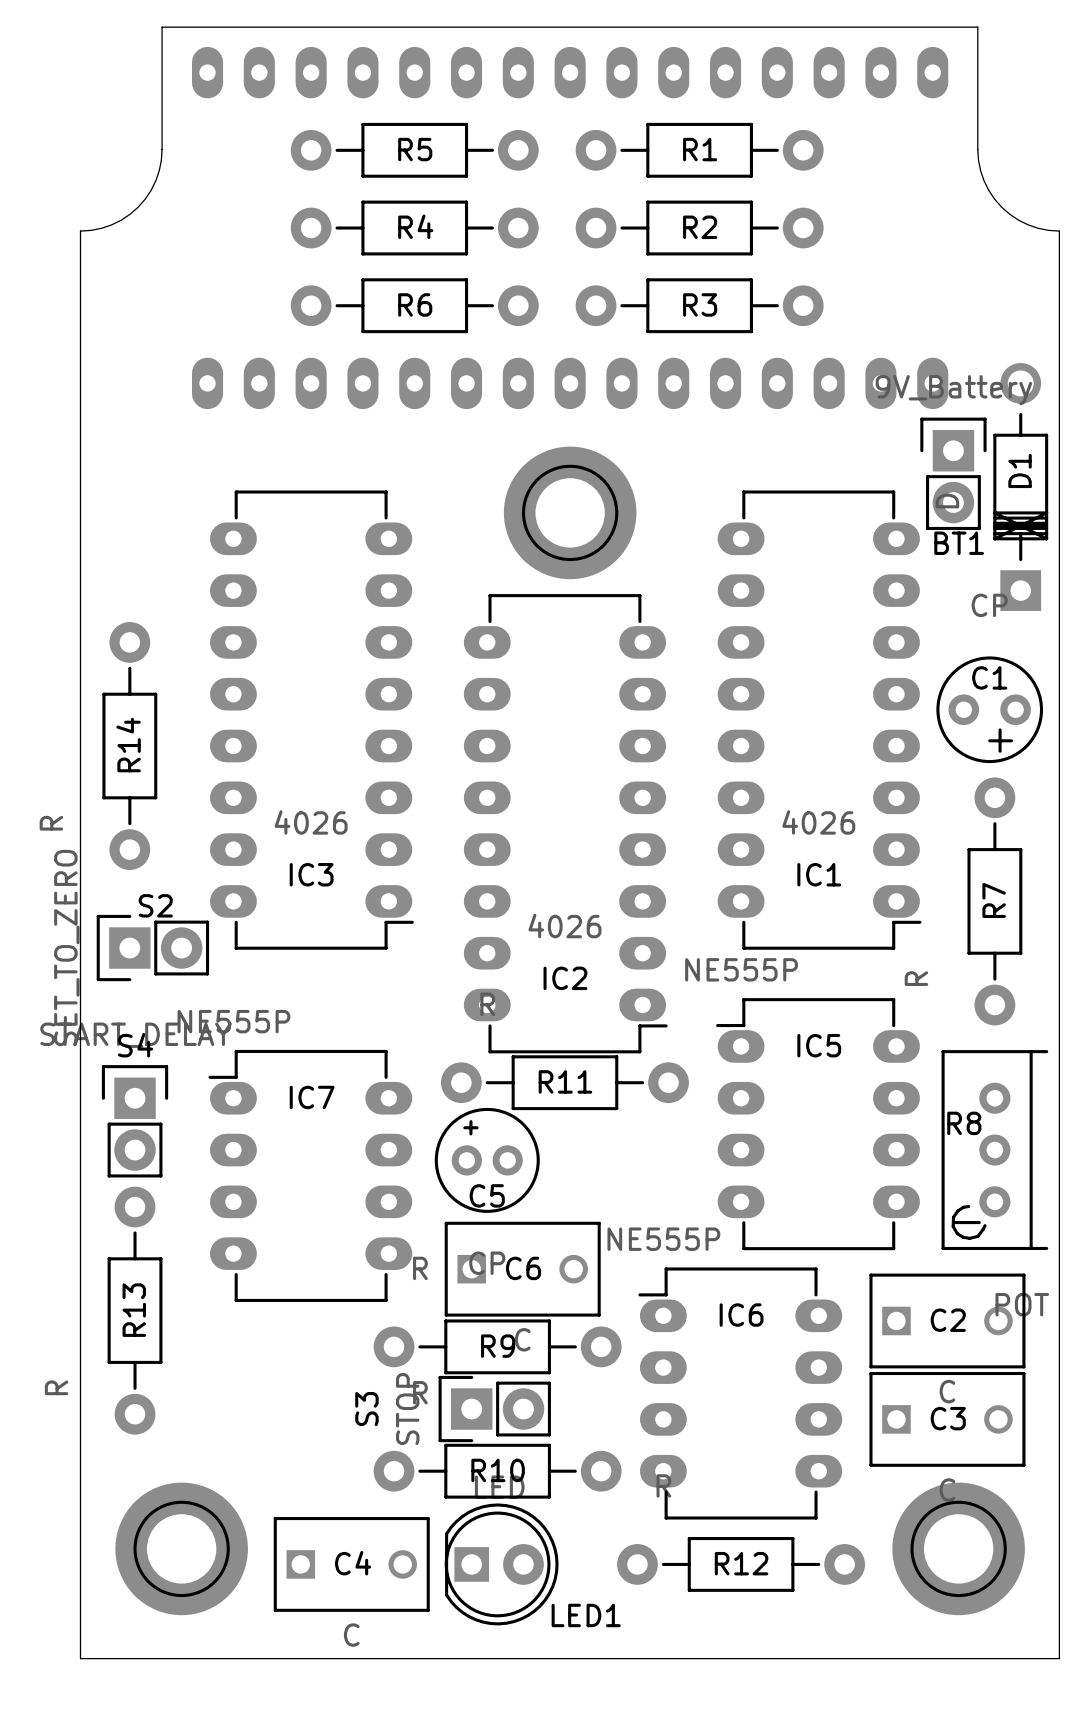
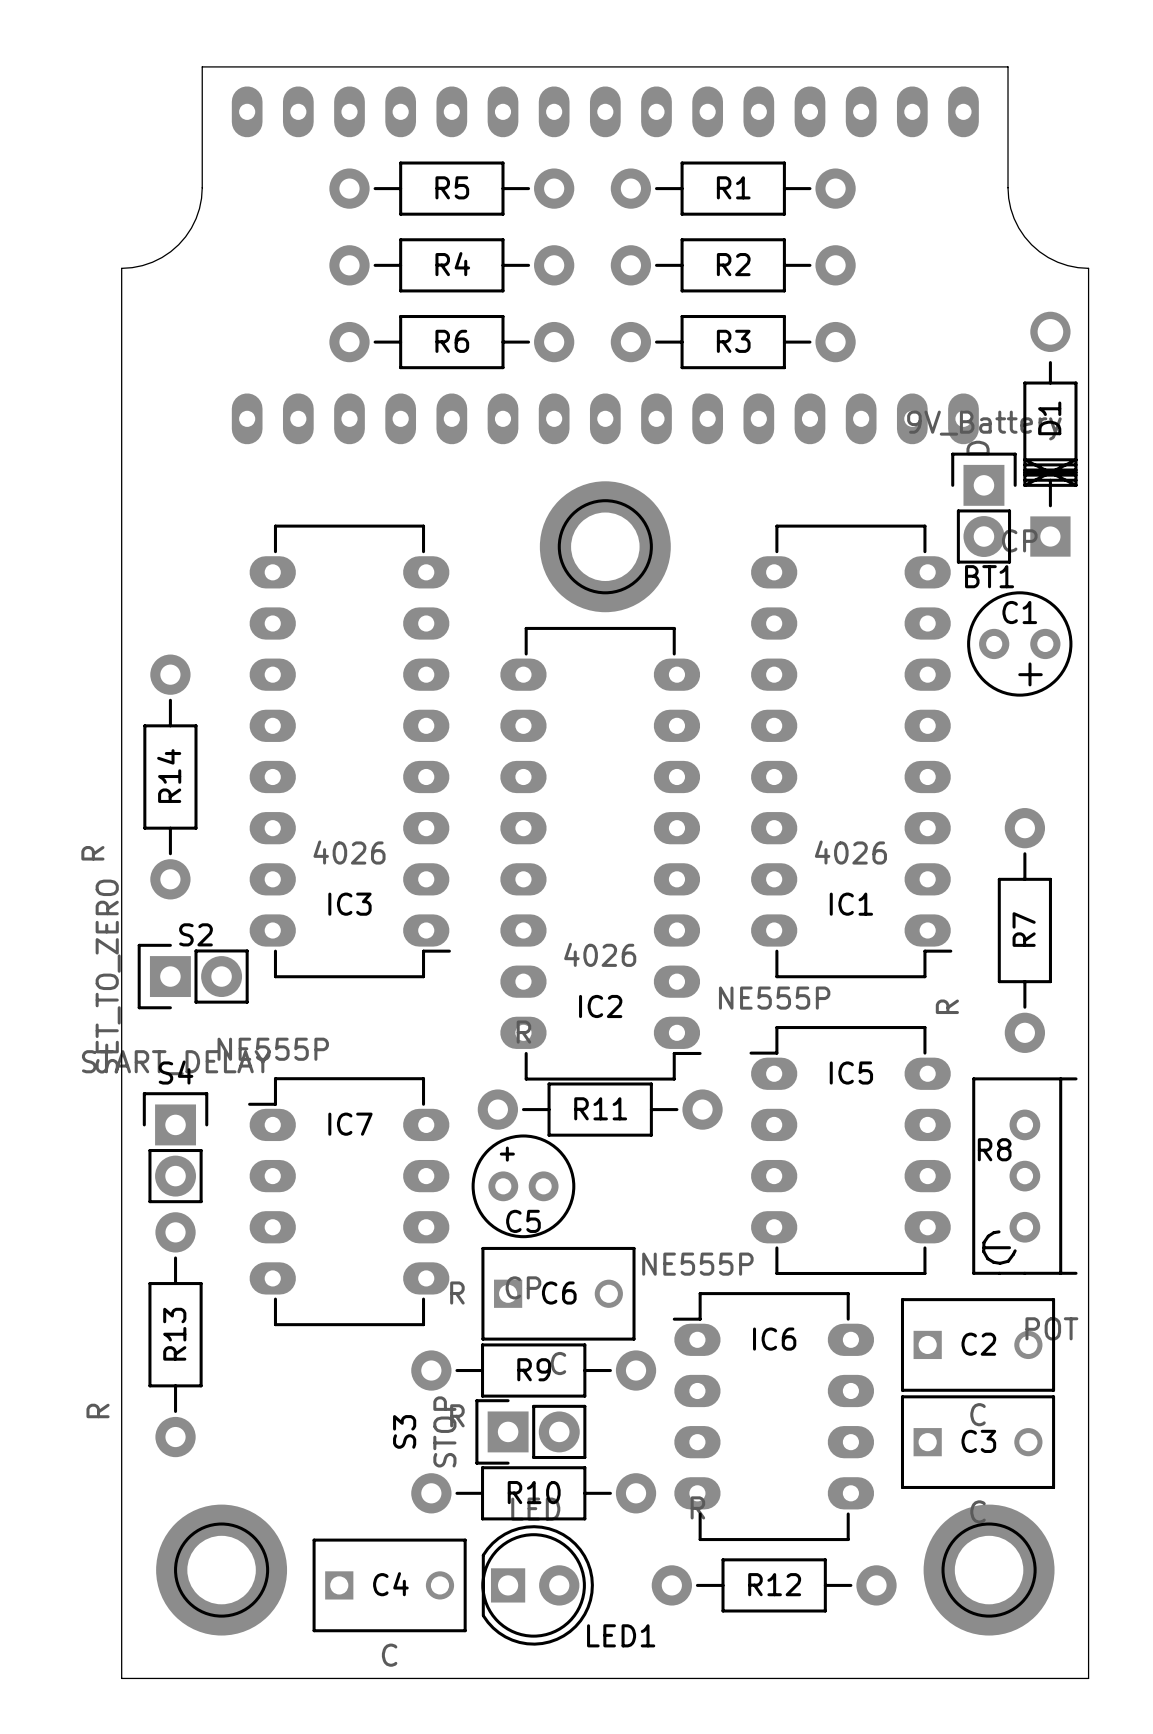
D1 position: (1020, 487) -> (1050, 434)
C1 position: (989, 709) -> (1019, 643)

